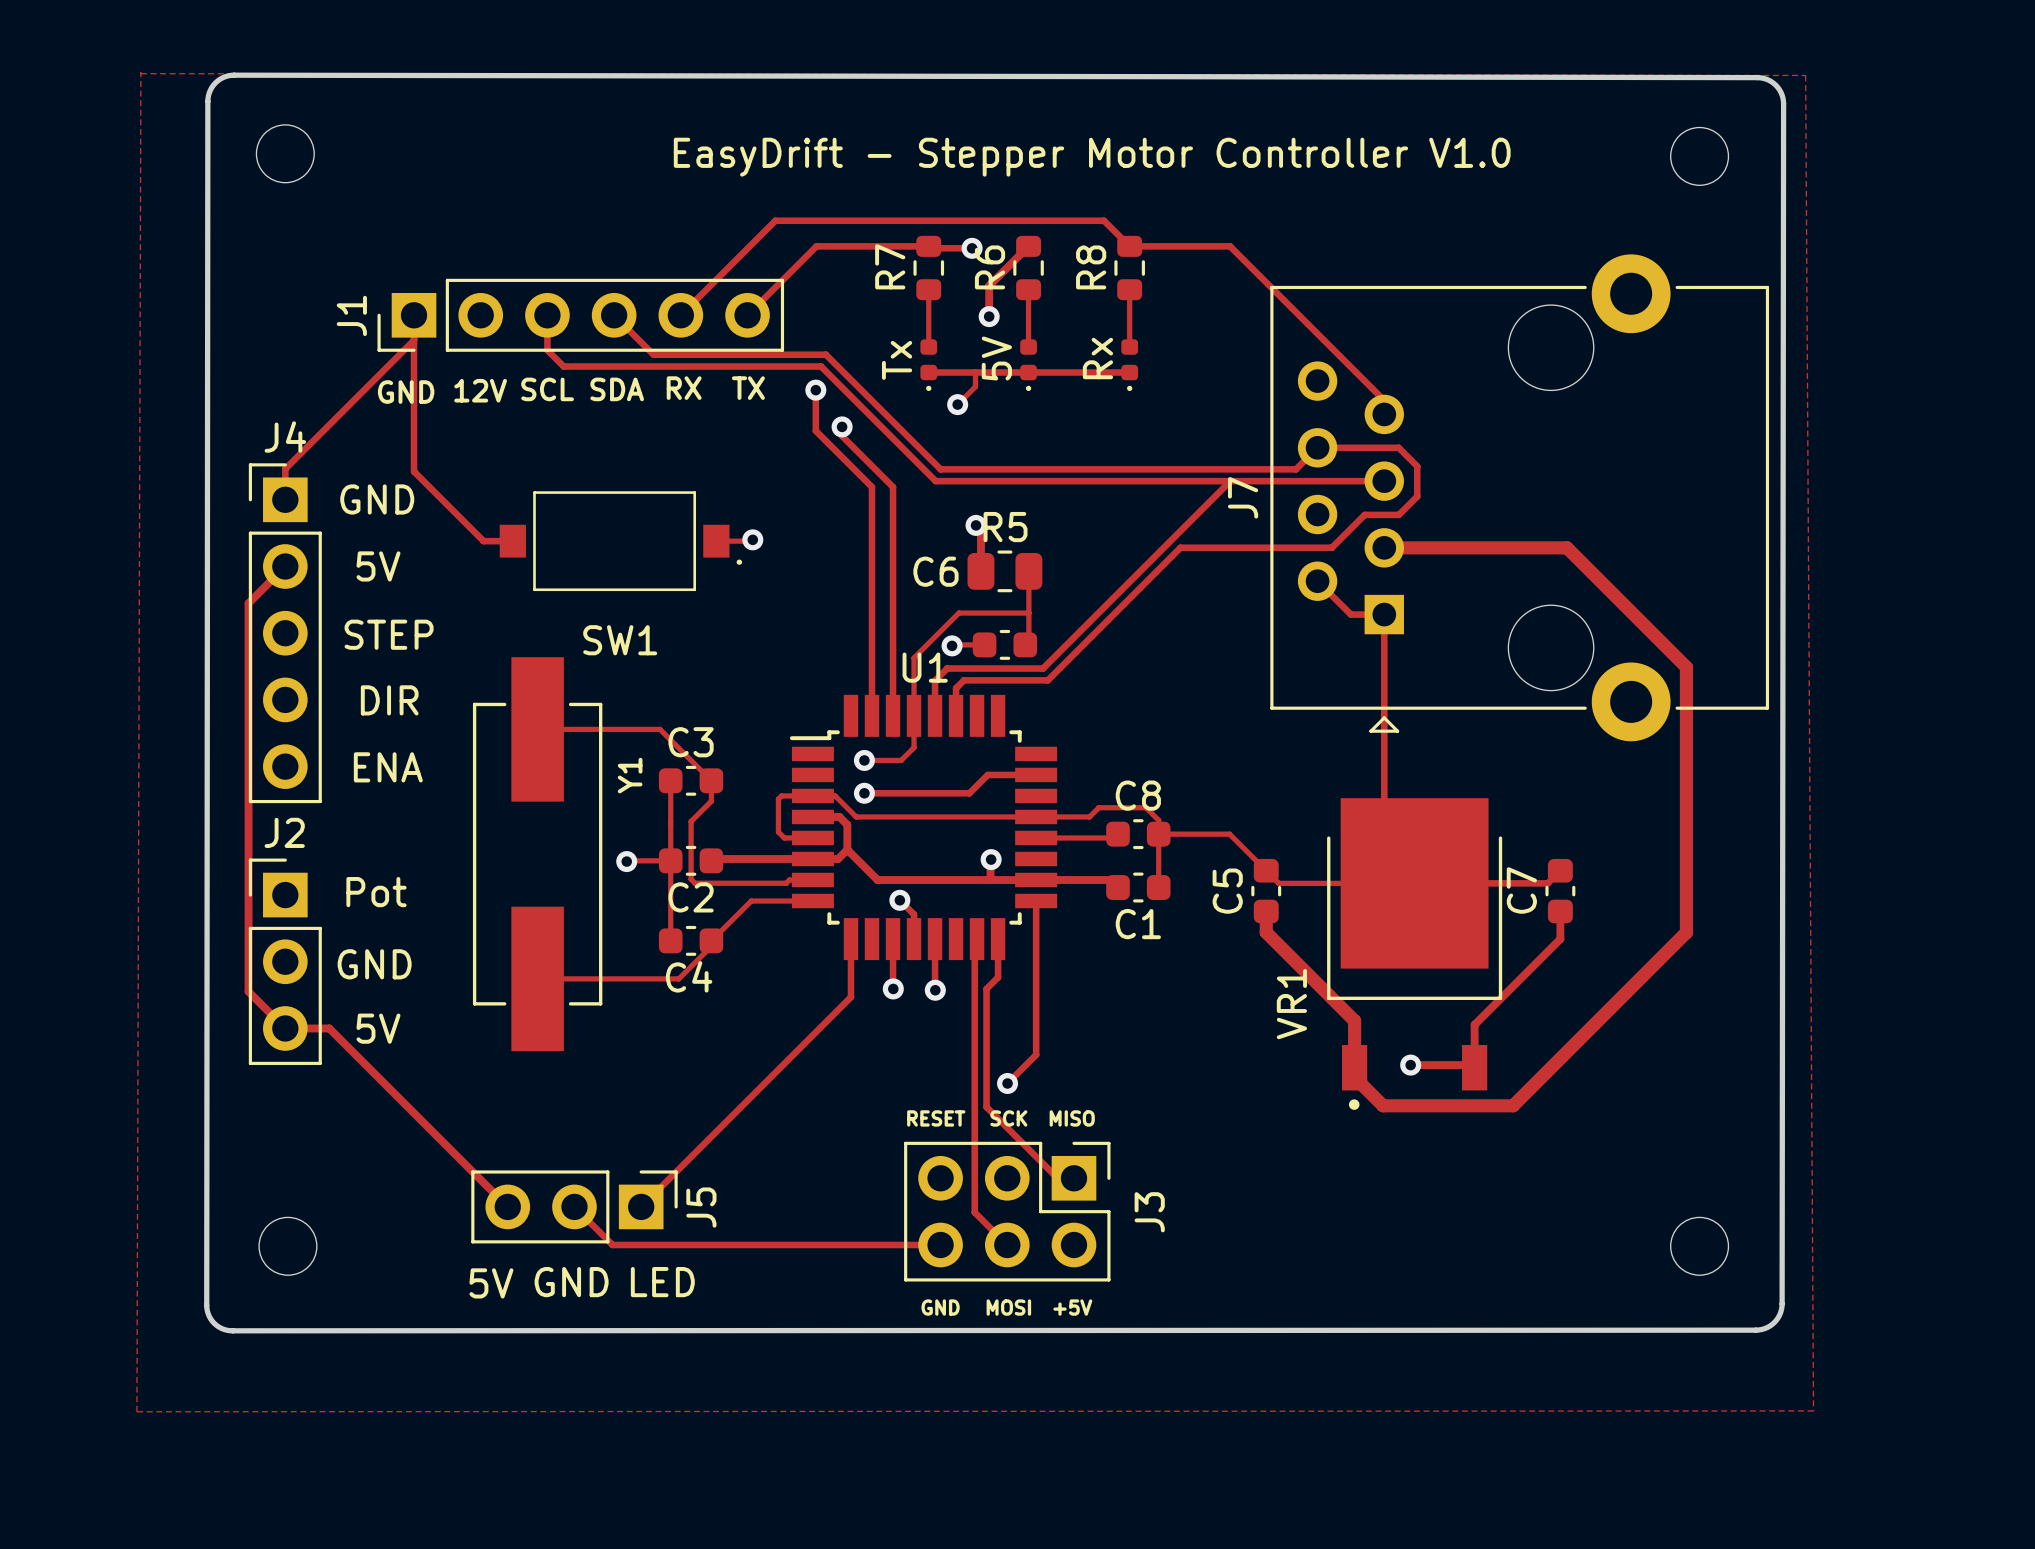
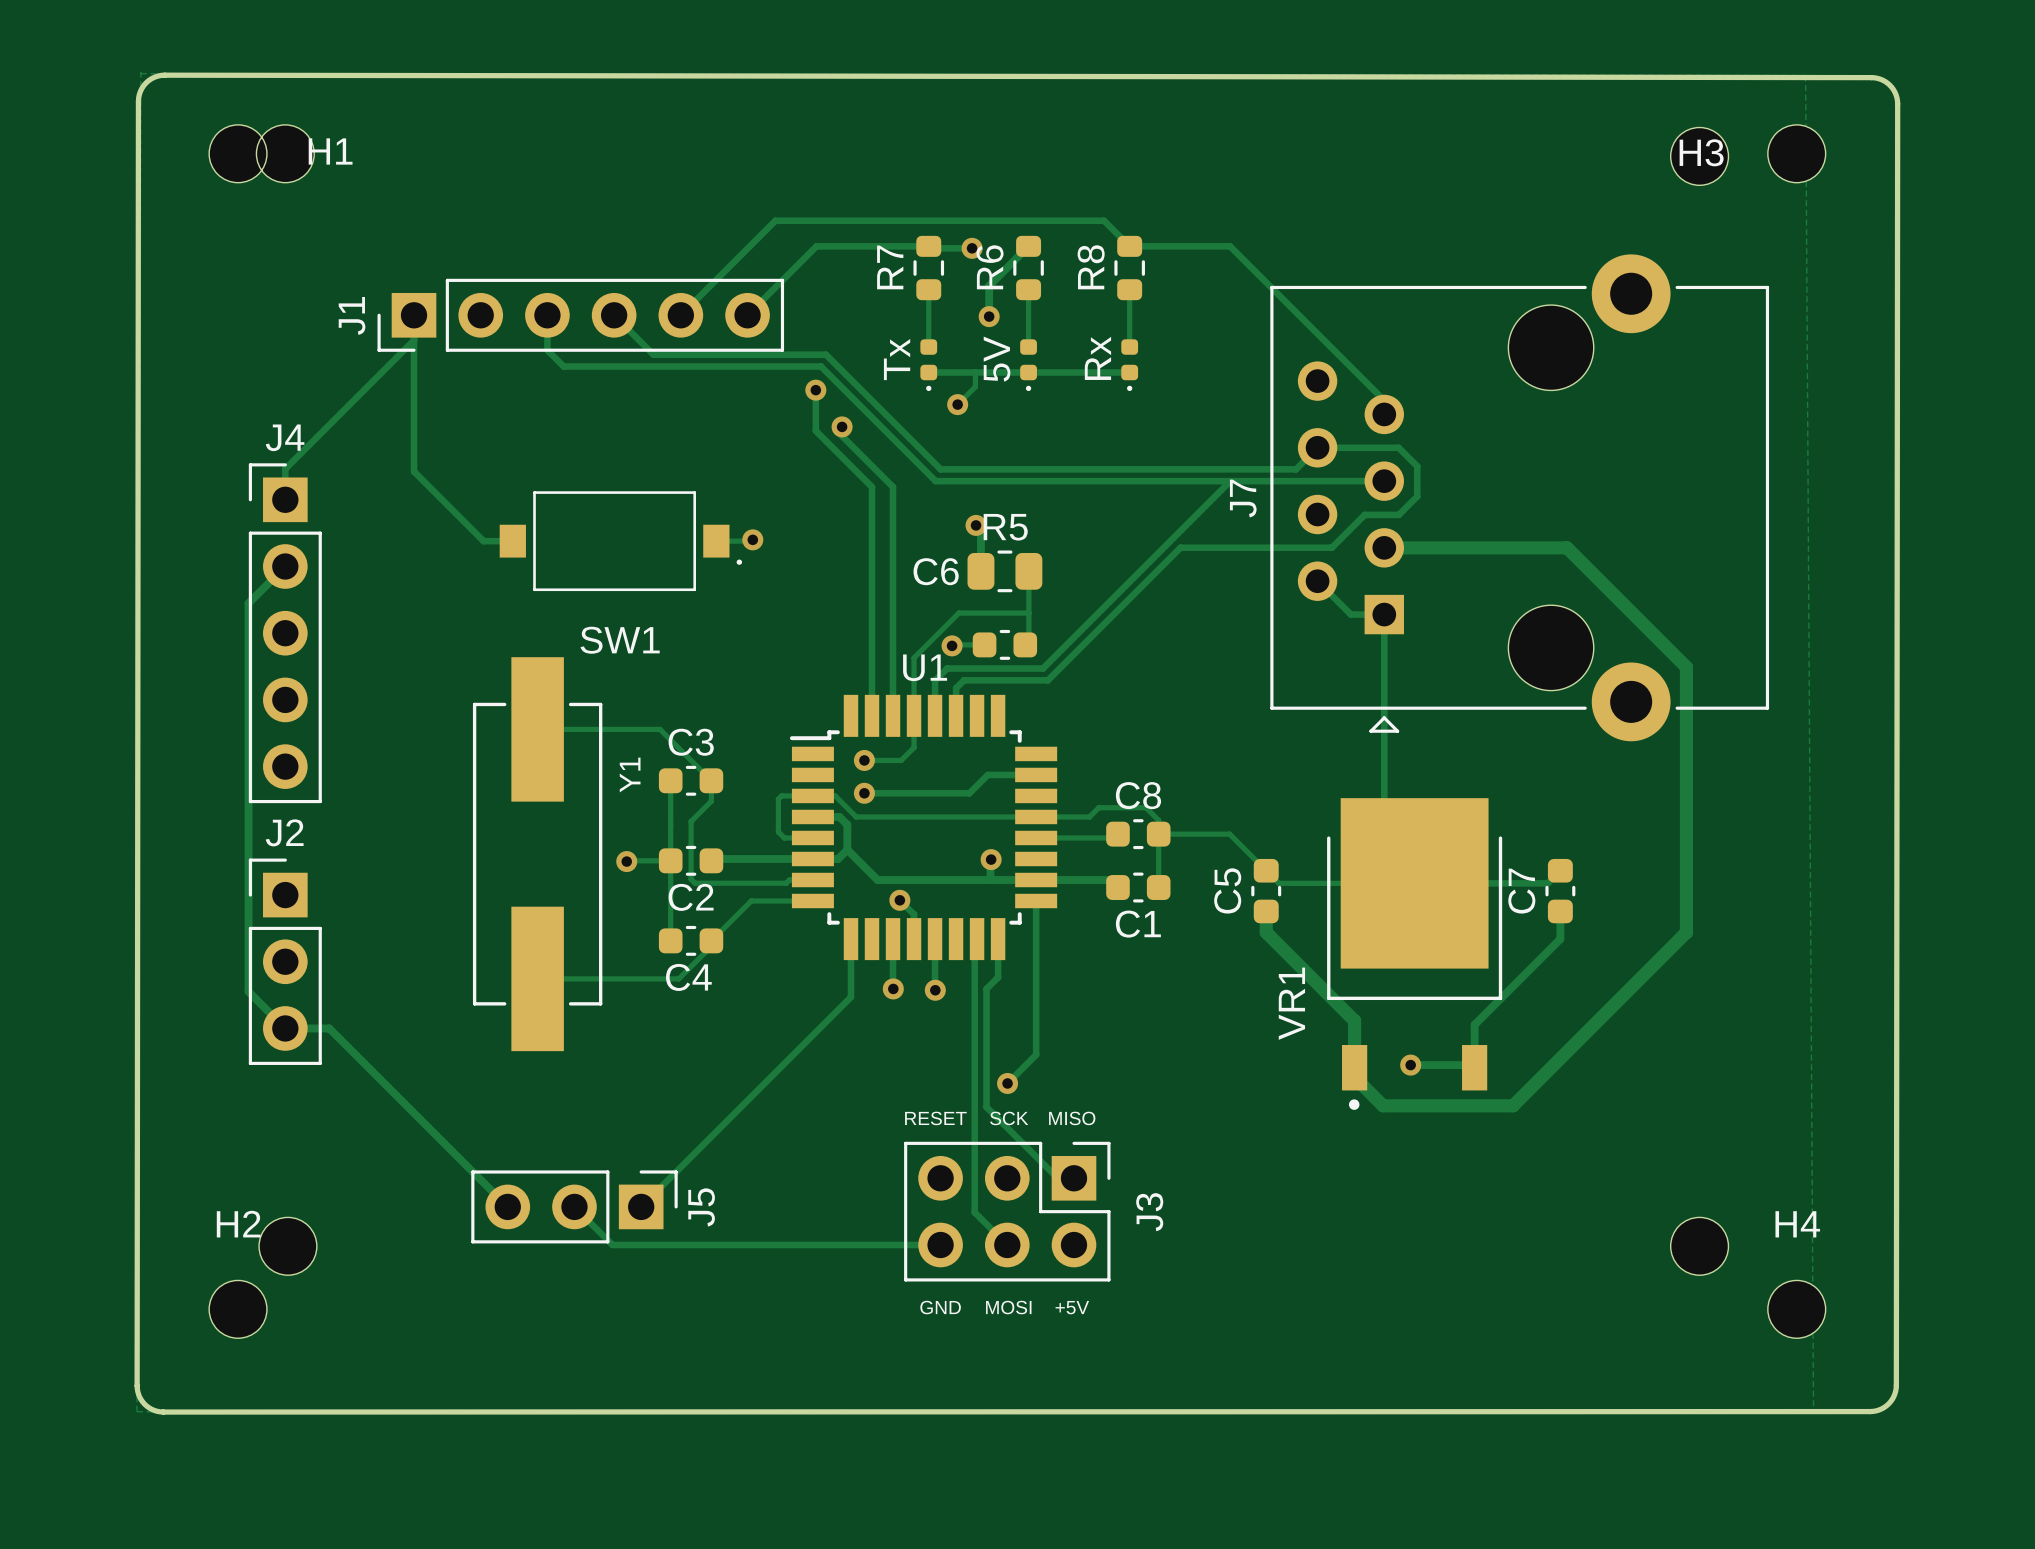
board edge: (234, 75) (1757, 77) (1773, 83) (1781, 92) (1783, 103) (1782, 1303) (1776, 1320) (1767, 1327) (1755, 1330) (232, 1330) (216, 1325) (209, 1316) (206, 1305) (207, 101) (210, 90) (215, 82) (225, 76) (234, 75) -> (164, 75) (154, 77) (146, 82) (140, 91) (138, 101) (137, 1385) (139, 1397) (147, 1406) (163, 1412) (1870, 1411) (1881, 1408) (1890, 1401) (1896, 1385) (1897, 103) (1895, 92) (1887, 83) (1871, 77) (164, 75)
H1: none -> (238, 153)
H3: none -> (1796, 153)
text: EasyDrift - Stepper Motor Controller V1.0 (1092, 157) -> none
text: RX (684, 388) -> none
text: TX (748, 388) -> none
text: SCL (547, 389) -> none
text: SDA (617, 389) -> none
text: 12V (480, 390) -> none
text: GND (406, 392) -> none
text: GND (377, 499) -> none
text: 5V (378, 566) -> none
text: STEP (389, 634) -> none
text: DIR (389, 700) -> none
text: ENA (388, 767) -> none
text: Pot (376, 892) -> none
text: GND (374, 964) -> none
text: 5V (378, 1028) -> none
text: GND (571, 1282) -> none
text: LED (662, 1282) -> none
text: 5V (491, 1283) -> none
H2: none -> (238, 1309)
H4: none -> (1796, 1309)

